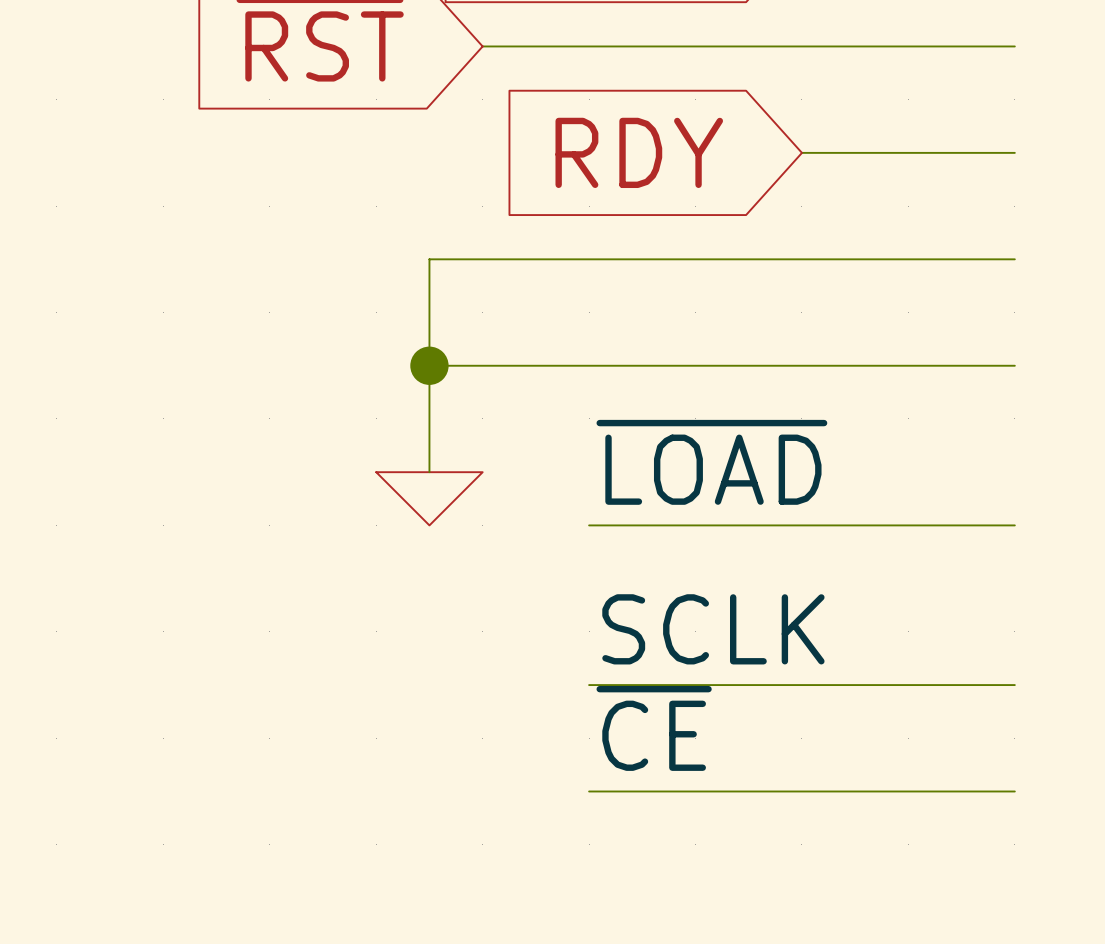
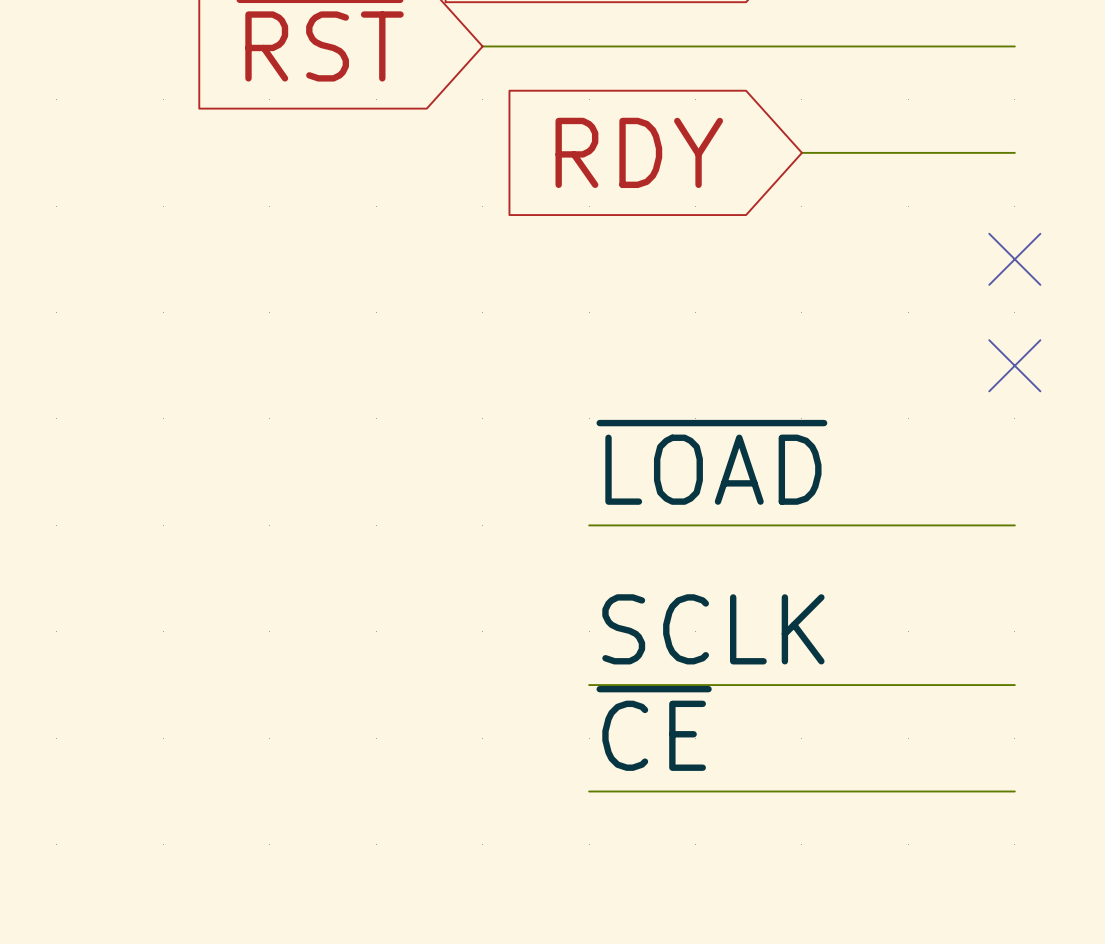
wire: (1014, 259) (429, 259) (429, 472) -> none
no-connect mark: none -> (1014, 259)
wire: (429, 365) (1014, 365) -> none
junction: (429, 365) -> none
no-connect mark: none -> (1014, 365)
power symbol: (429, 498) -> none

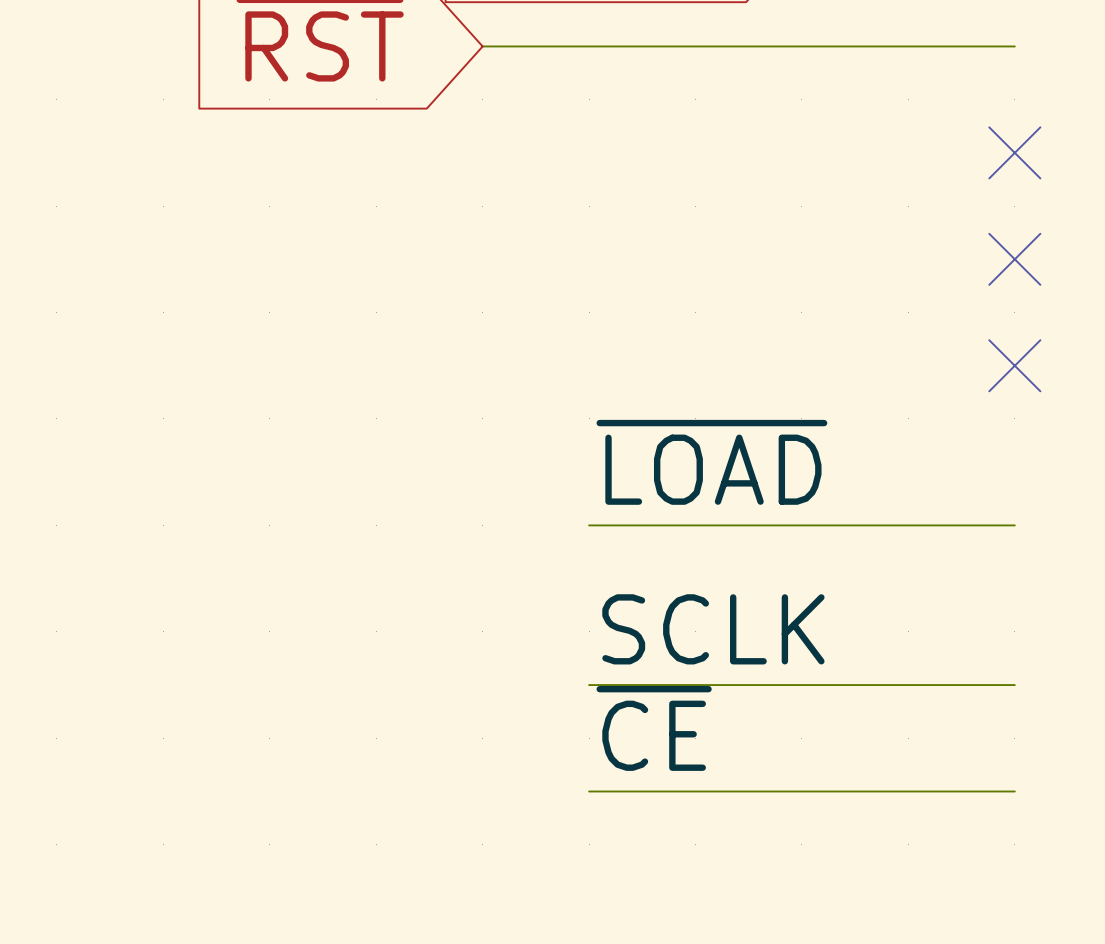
global label: RDY (639, 152) -> none
wire: (801, 152) (1014, 152) -> none
no-connect mark: none -> (1014, 152)

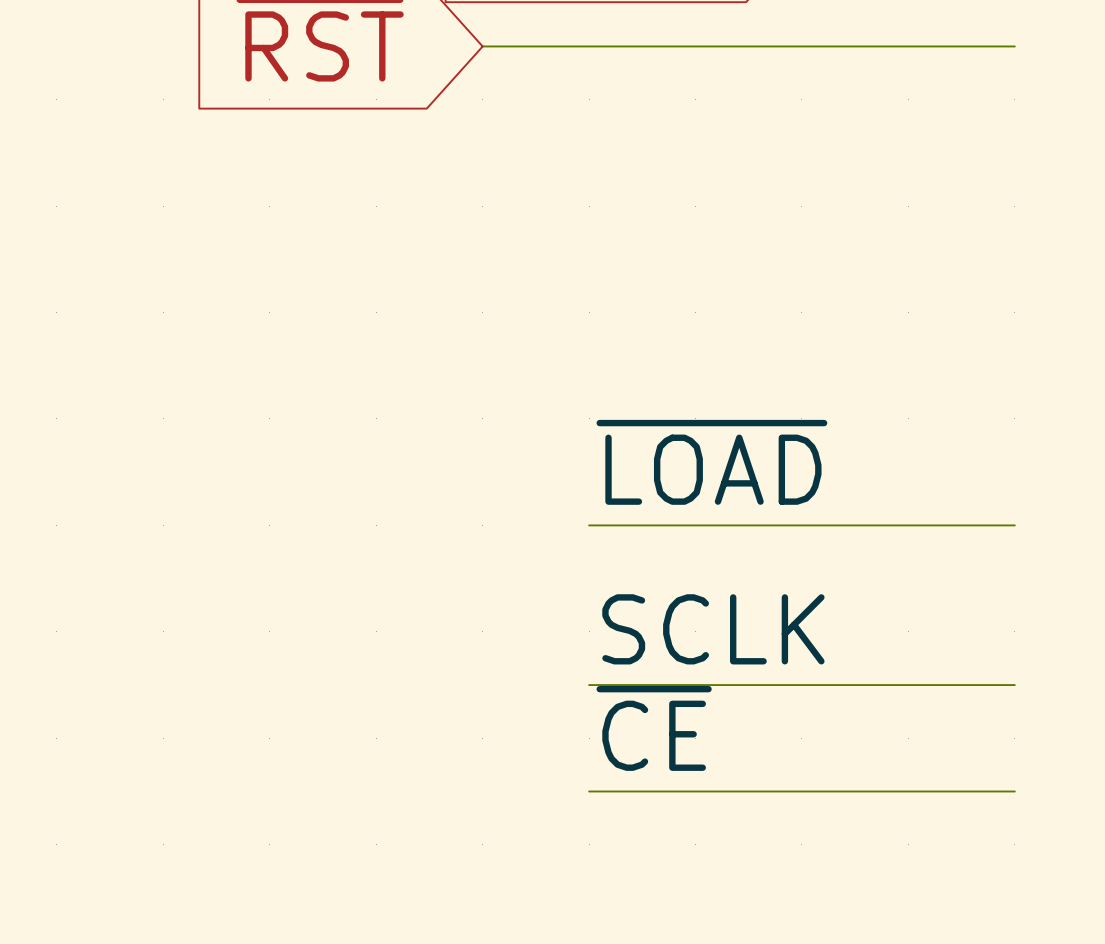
no-connect mark: (1014, 152) -> none
no-connect mark: (1014, 259) -> none
no-connect mark: (1014, 365) -> none

